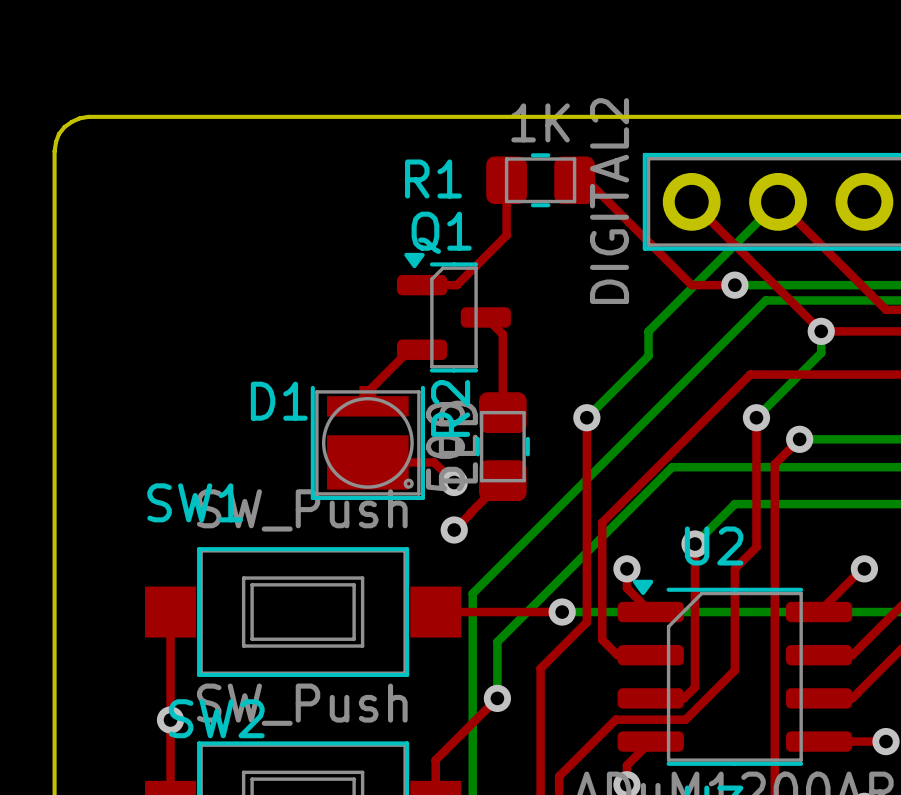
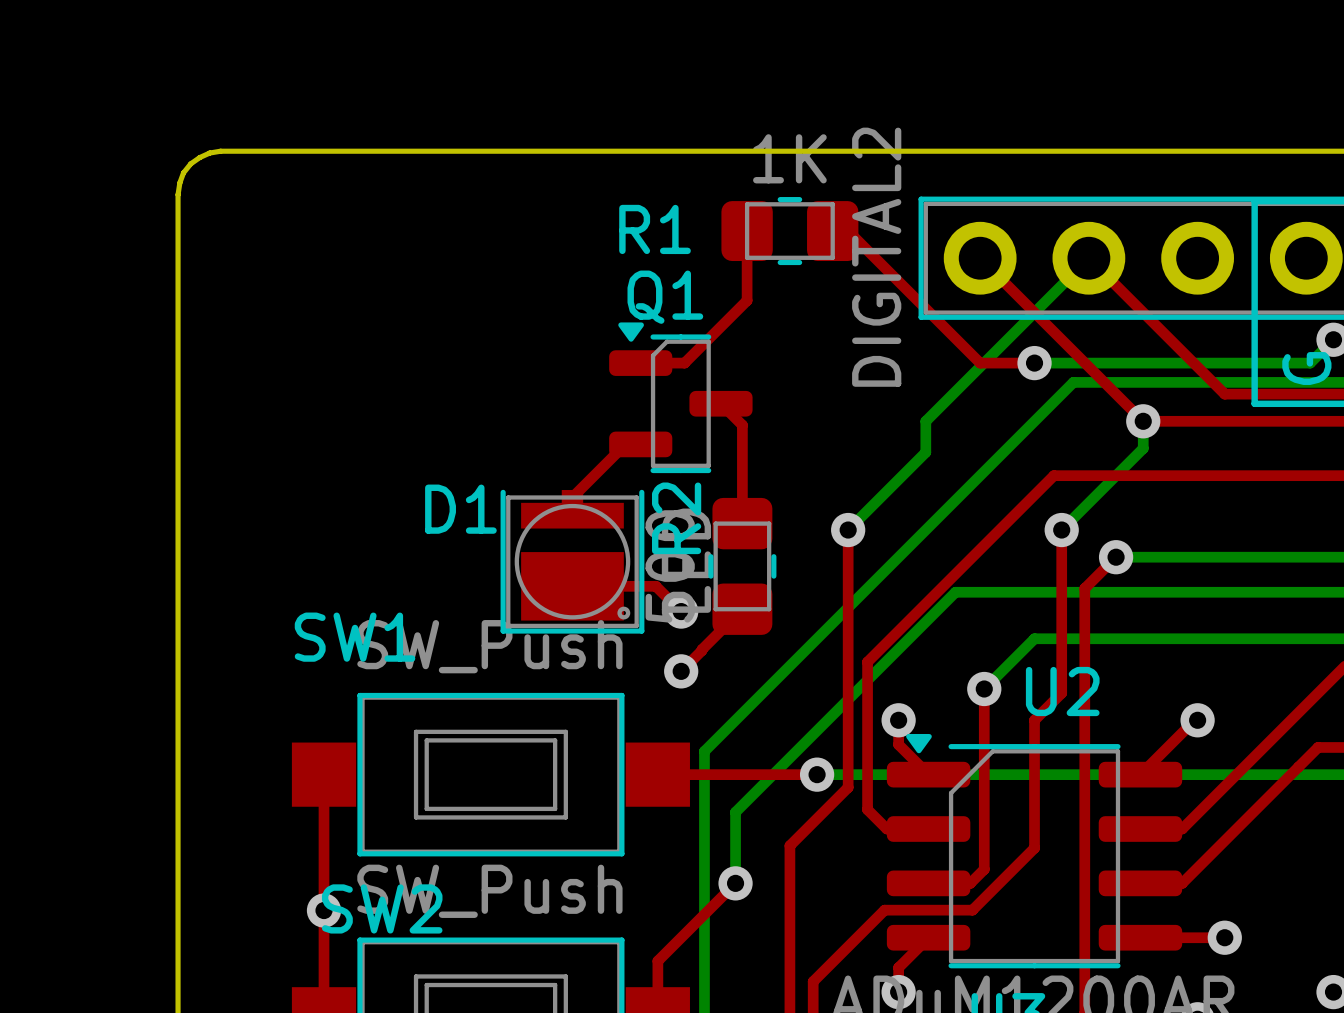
U2 name position: U2 (714, 546) -> U2 (1062, 691)

